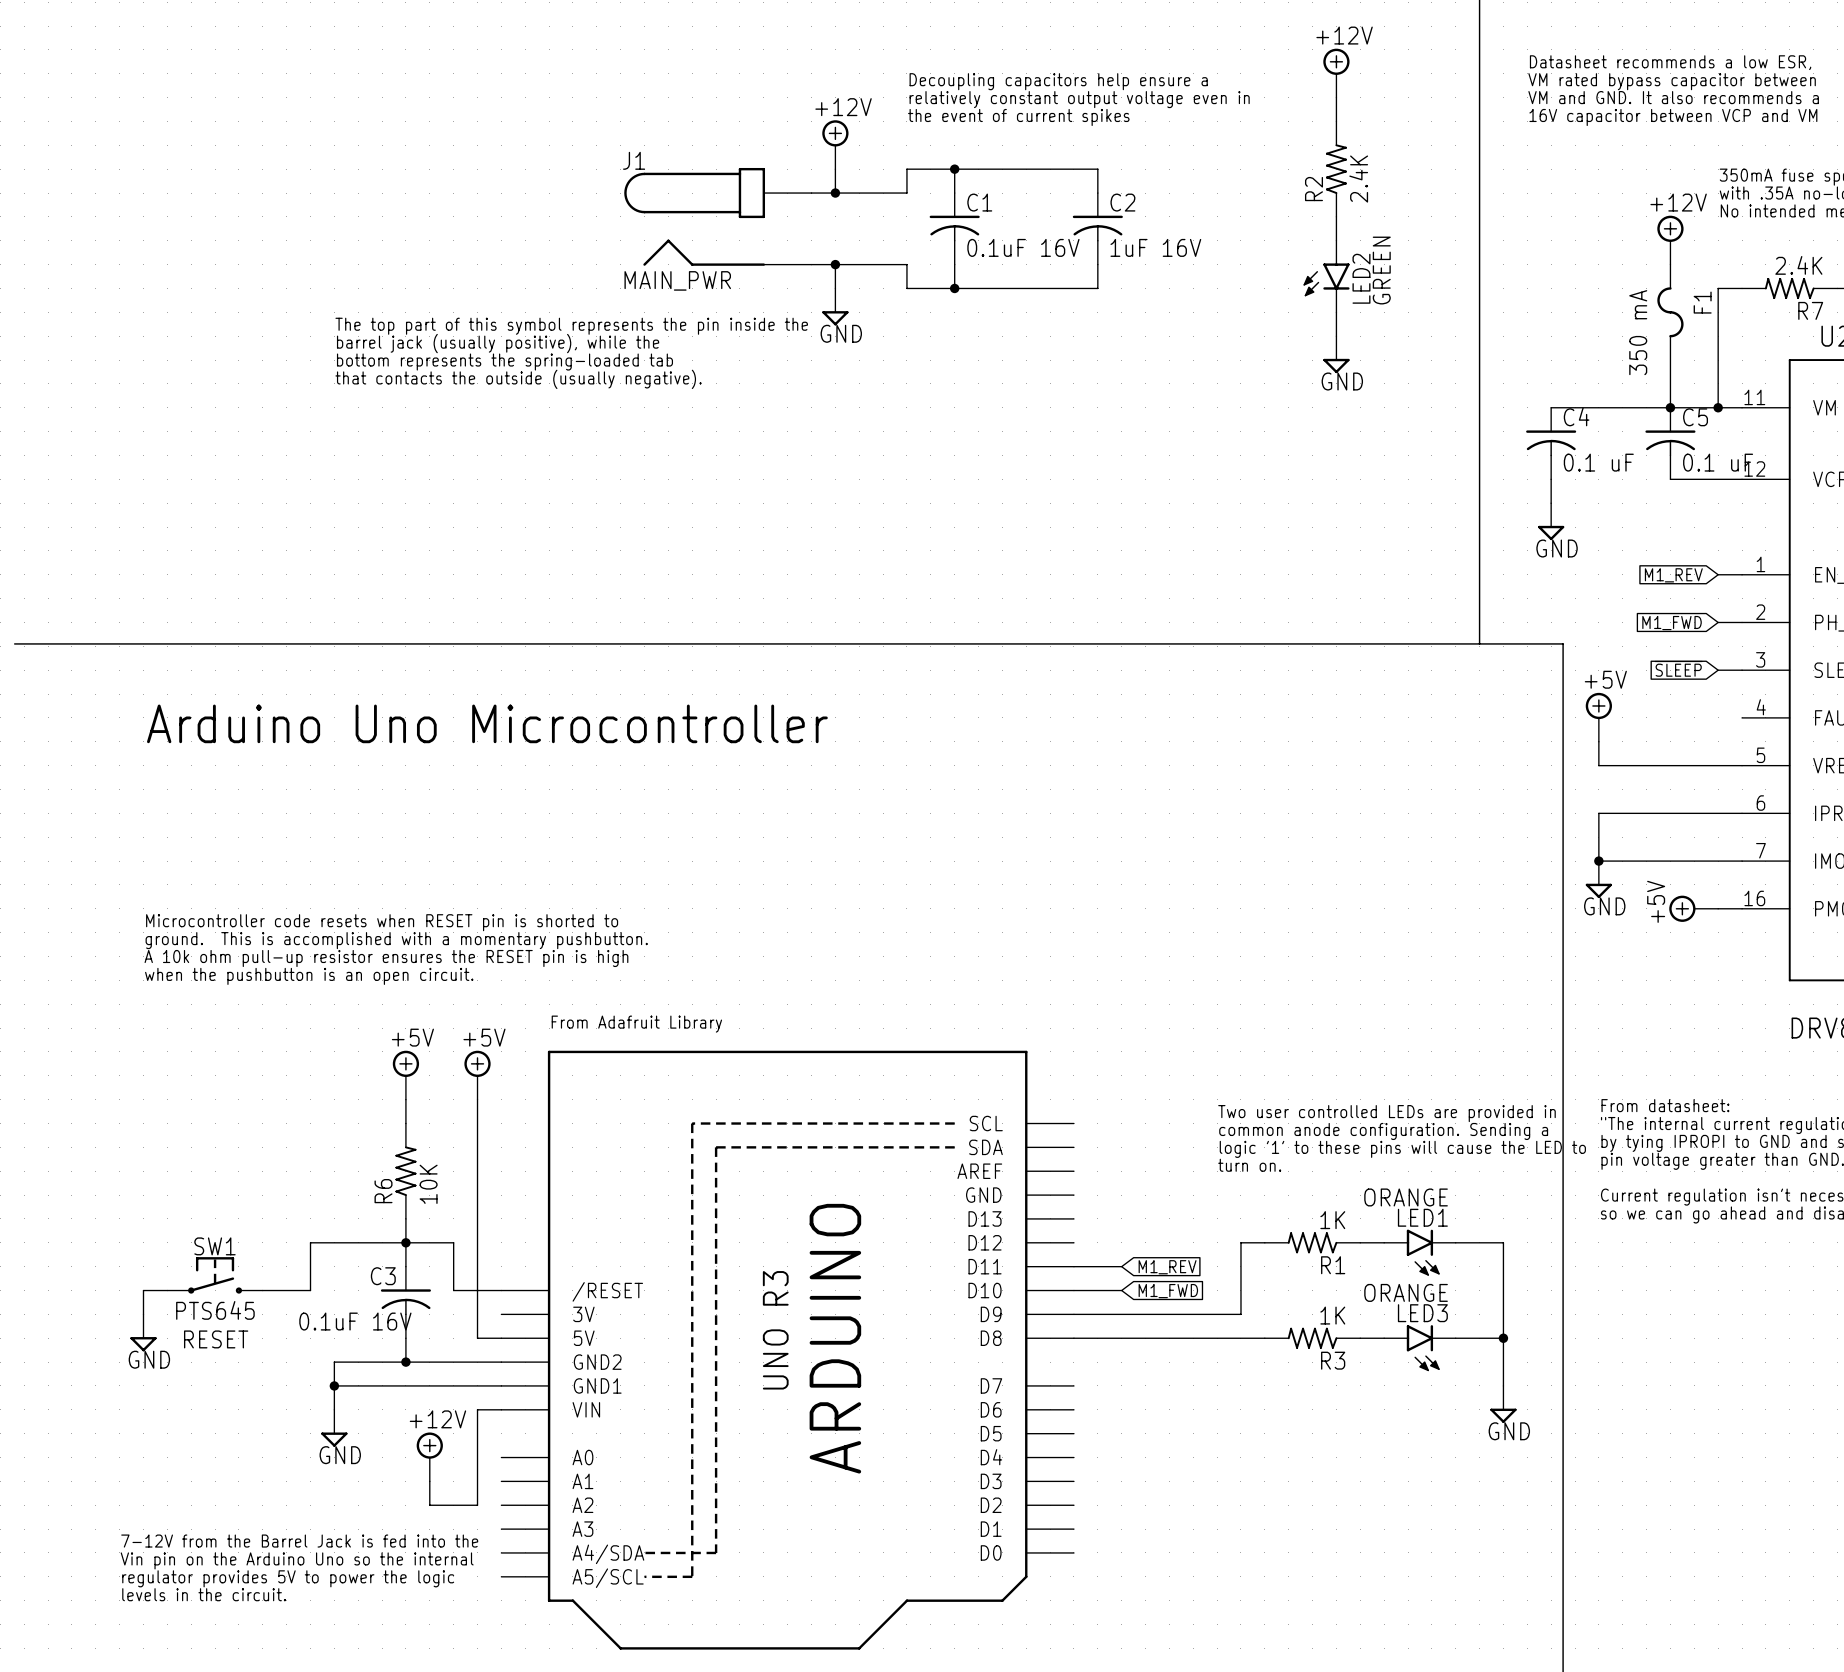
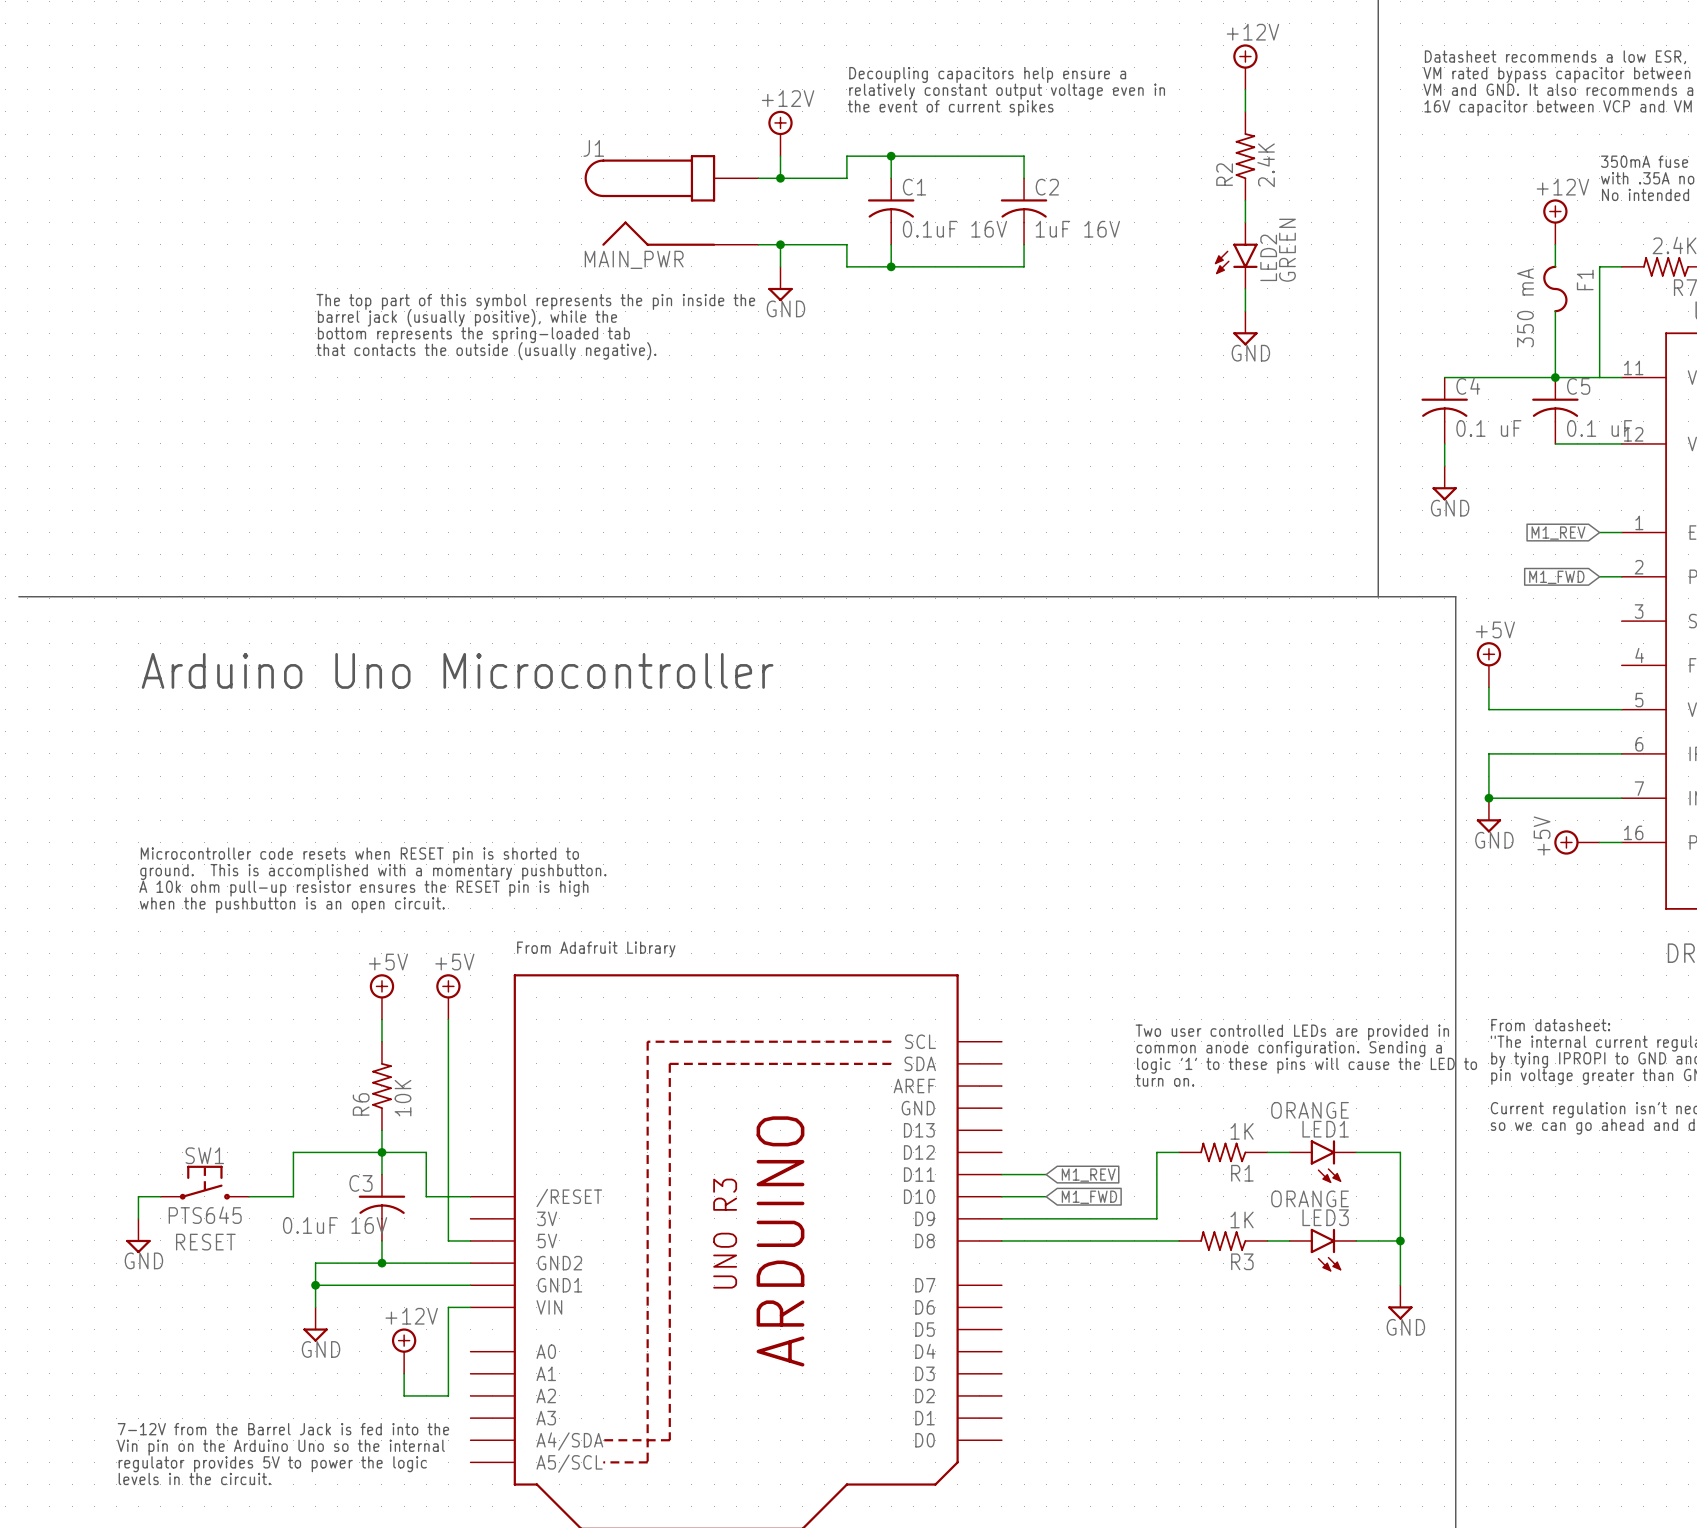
junction: (1718, 407) -> none
global label: ~{SLEEP} (1678, 668) -> none
wire: (1718, 670) (1742, 670) -> none

